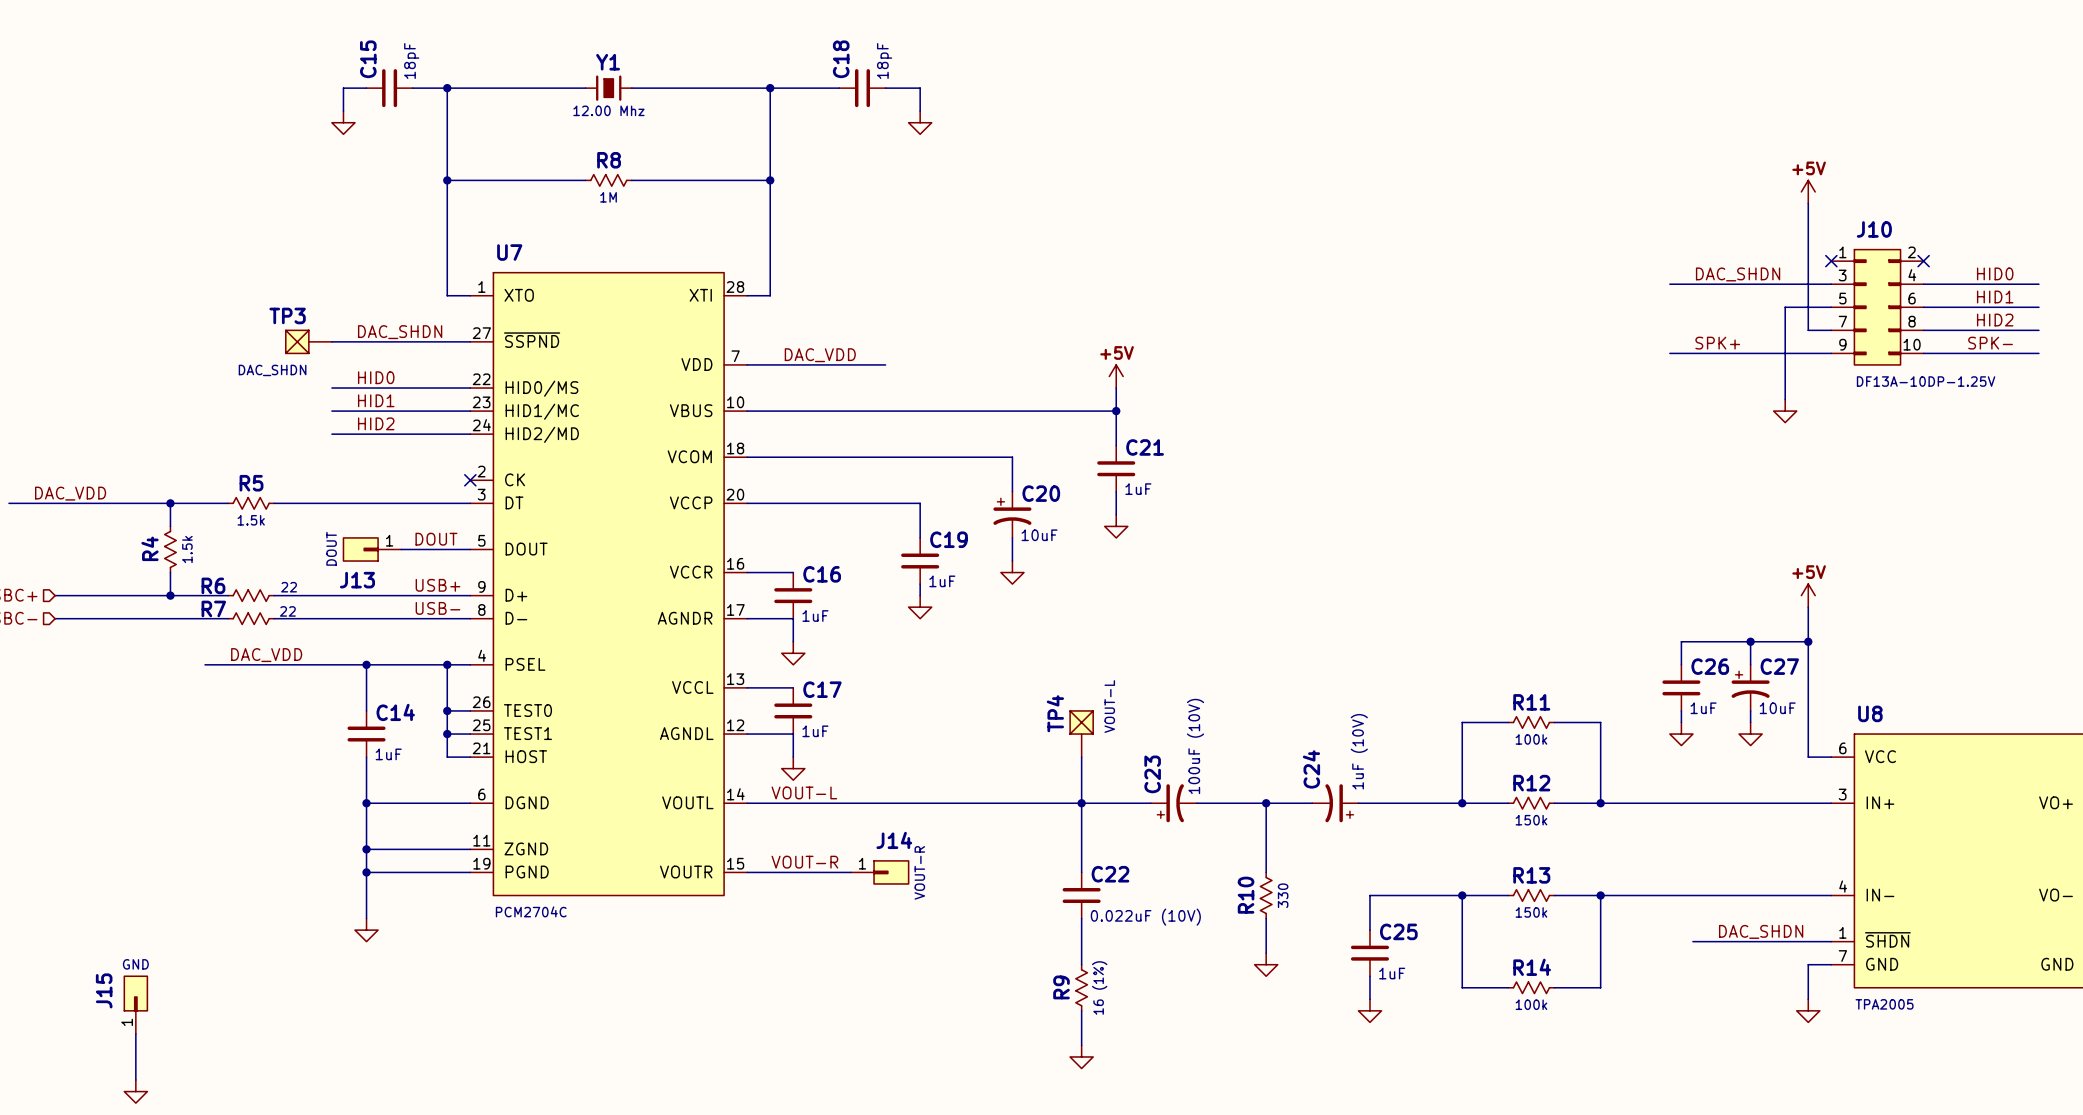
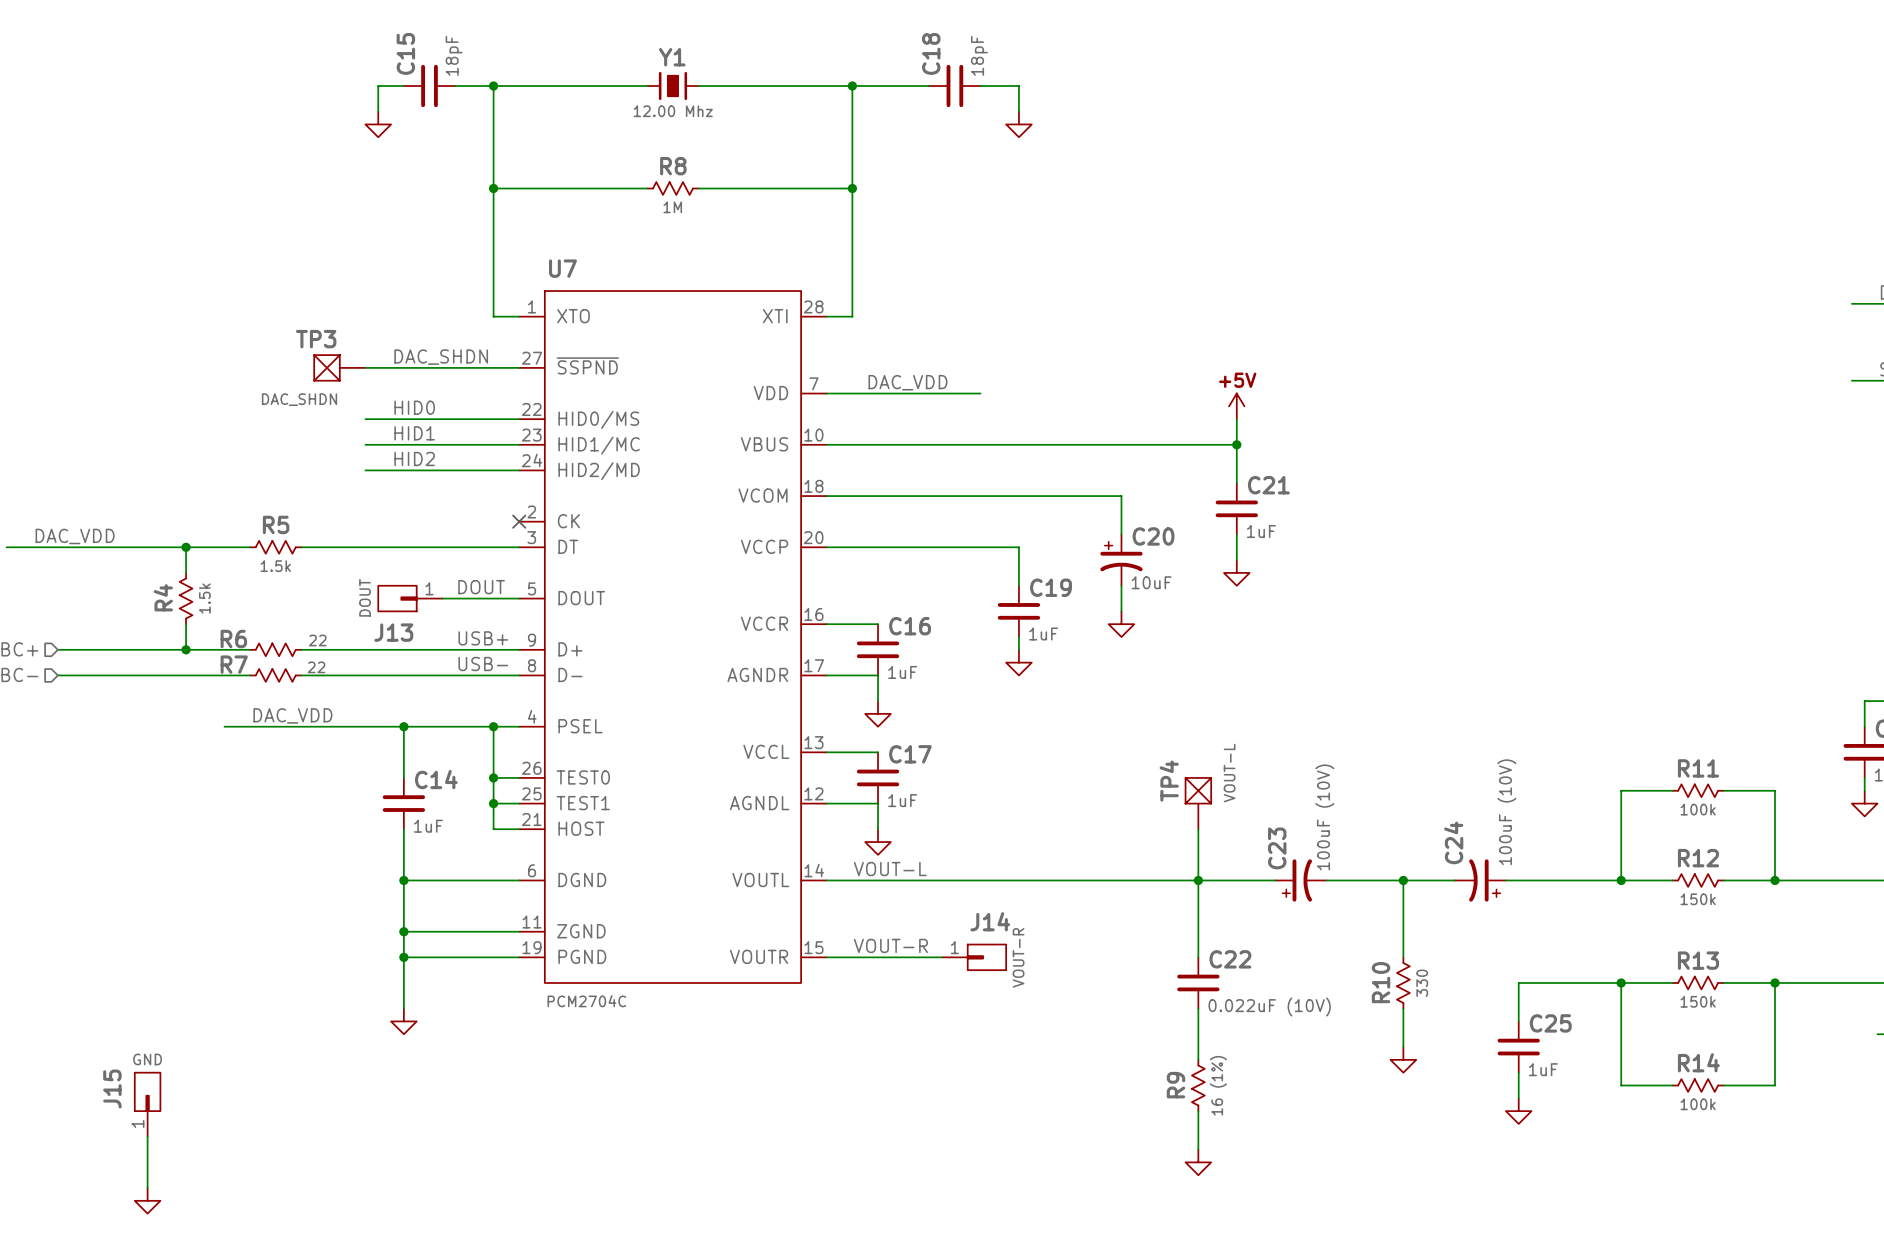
C24 value: 1uF (10V) (1359, 751) -> 100uF (10V) (1506, 812)

